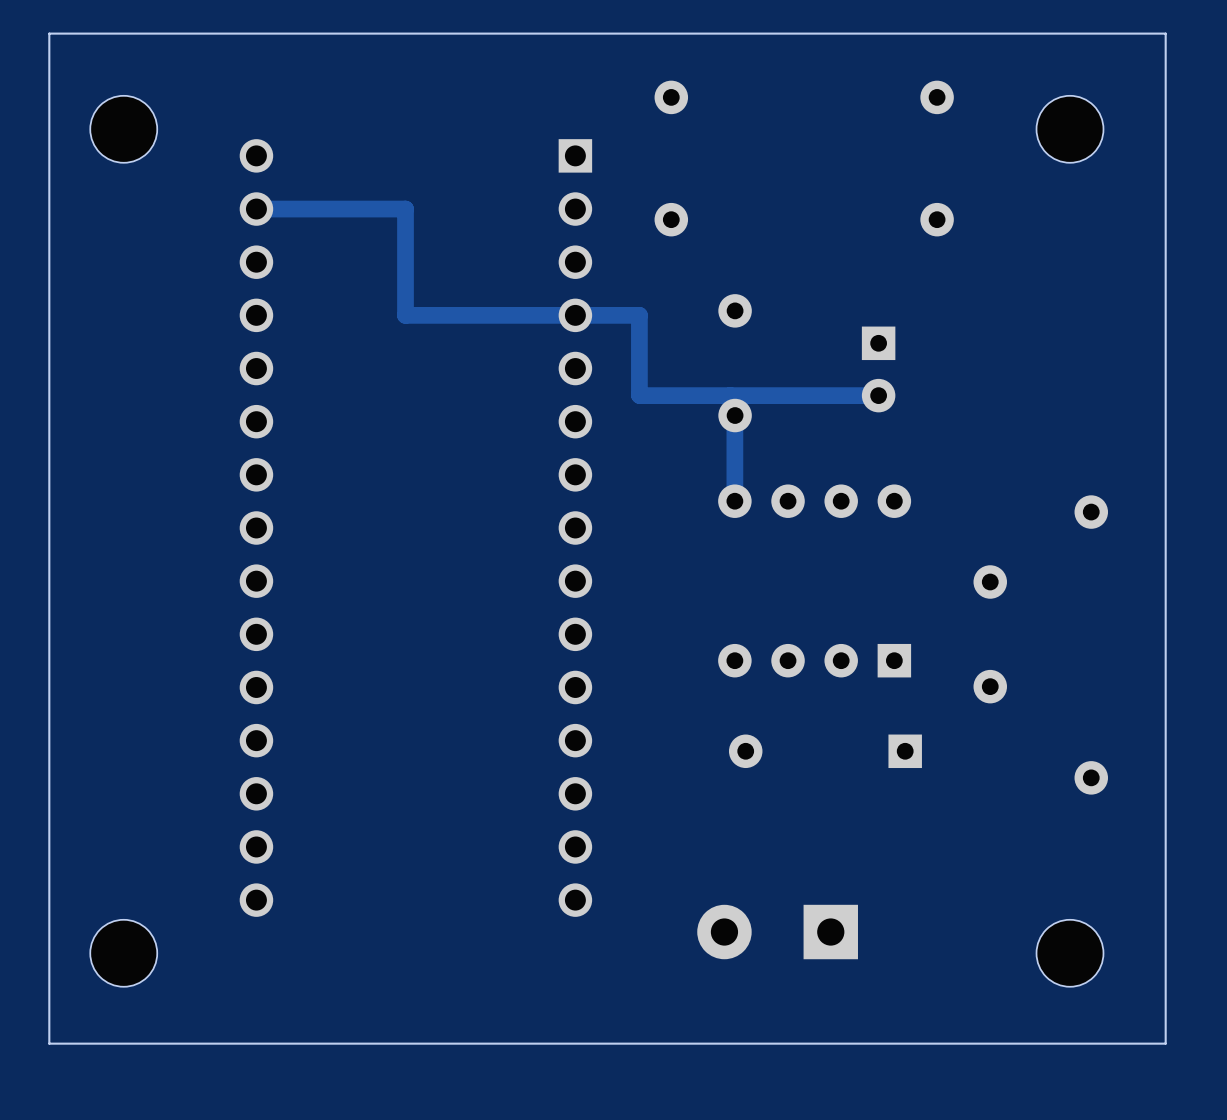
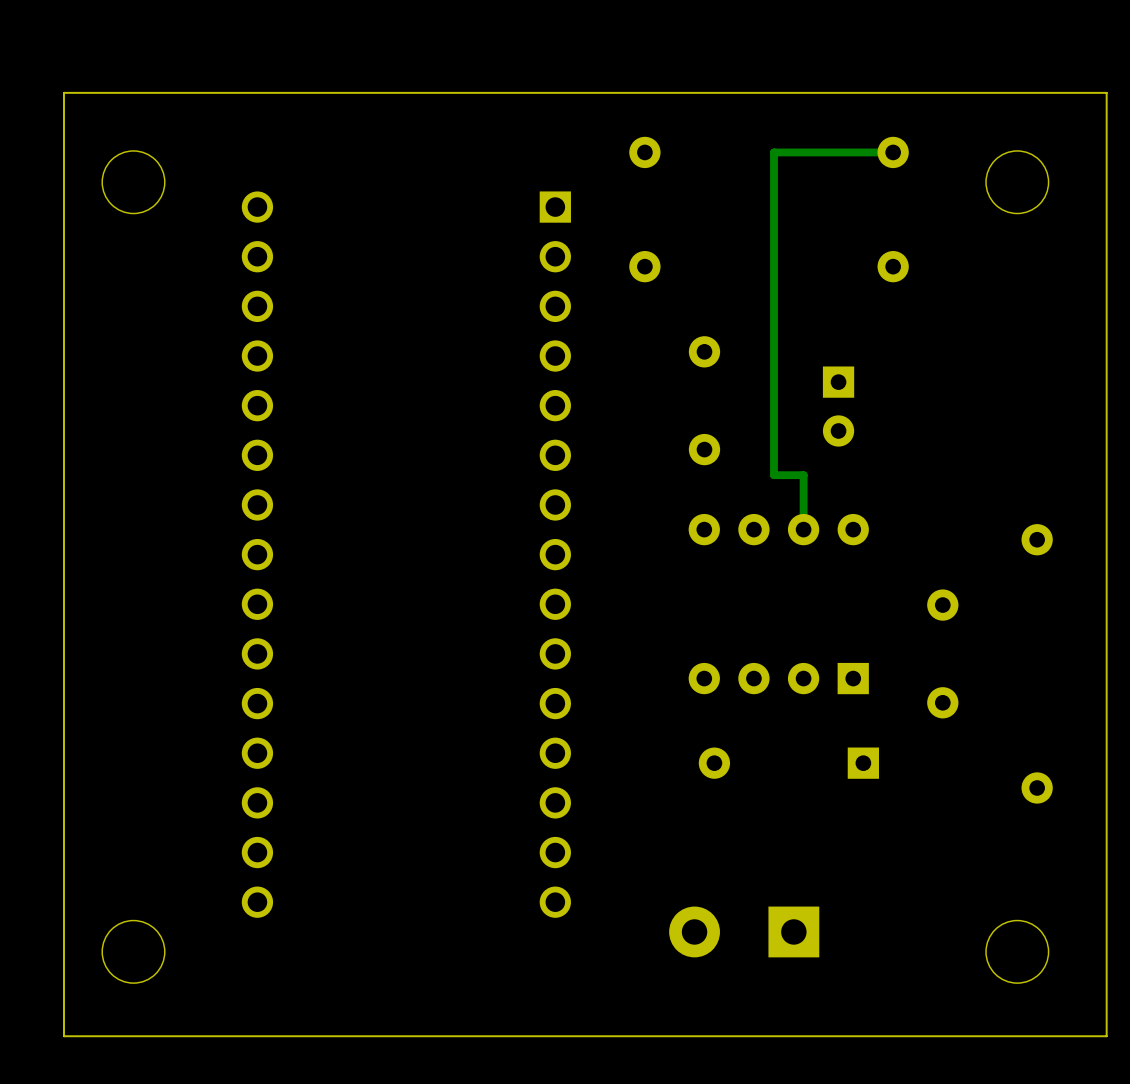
track: none -> (893, 152) (774, 152) (774, 475) (803, 475)
track: (256, 209) (405, 209) (405, 315) (639, 315) (639, 395) (878, 395) -> none
track: (734, 415) (734, 501) -> none
track: none -> (803, 475) (803, 529)

